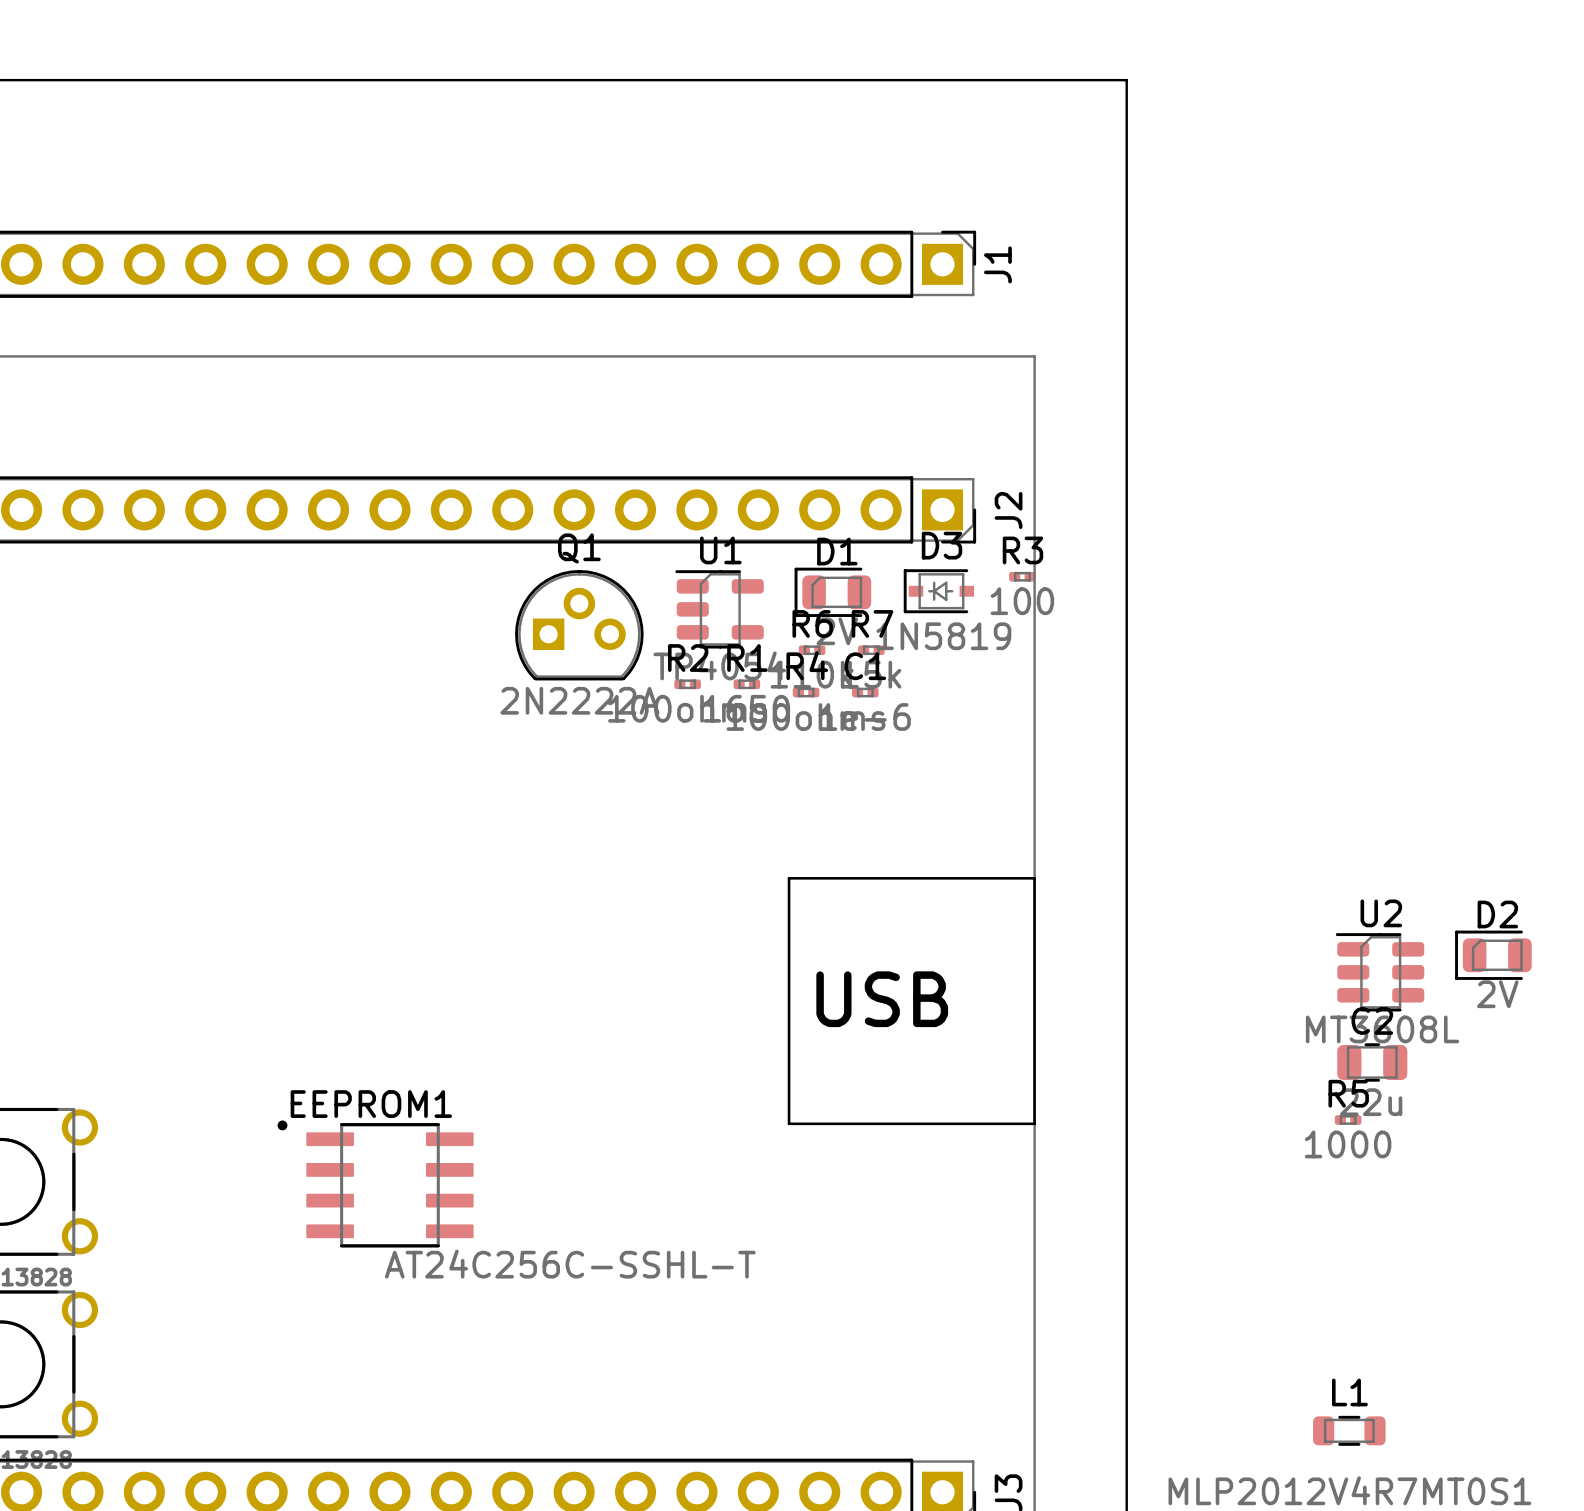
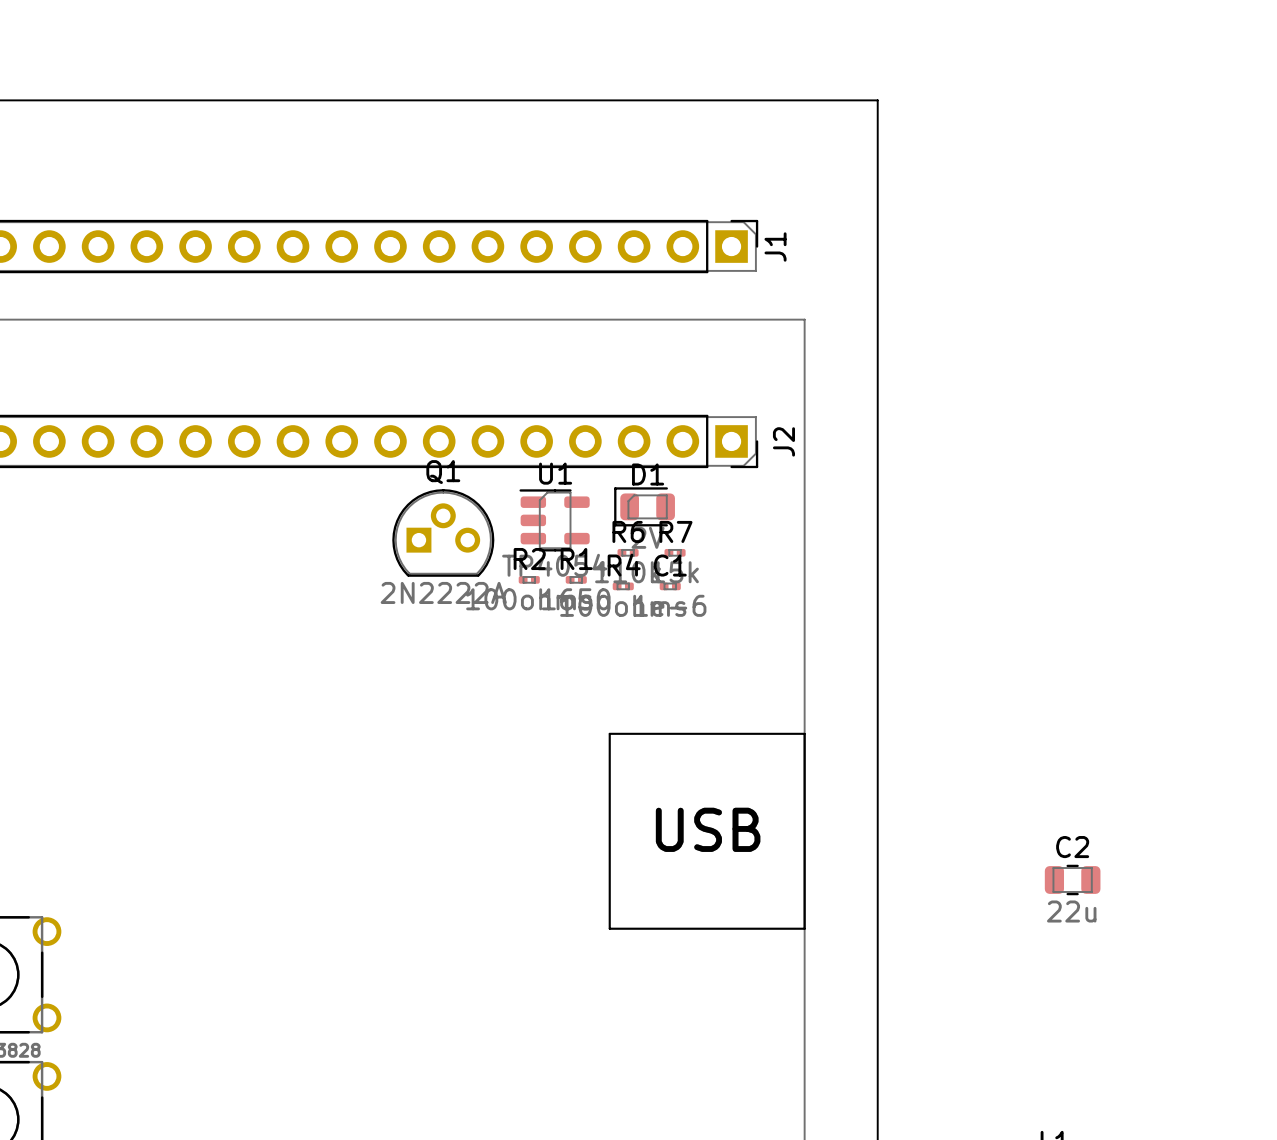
R3: 100 (1022, 576) -> none
D3: 1N5819 (938, 591) -> none
D2: 2V (1493, 955) -> none
U2: MT3608L (1380, 972) -> none
text: USB (882, 999) -> none
text: none -> USB (708, 829)
R5: 1000 (1348, 1120) -> none
EEPROM1: AT24C256C-SSHL-T (375, 1184) -> none

